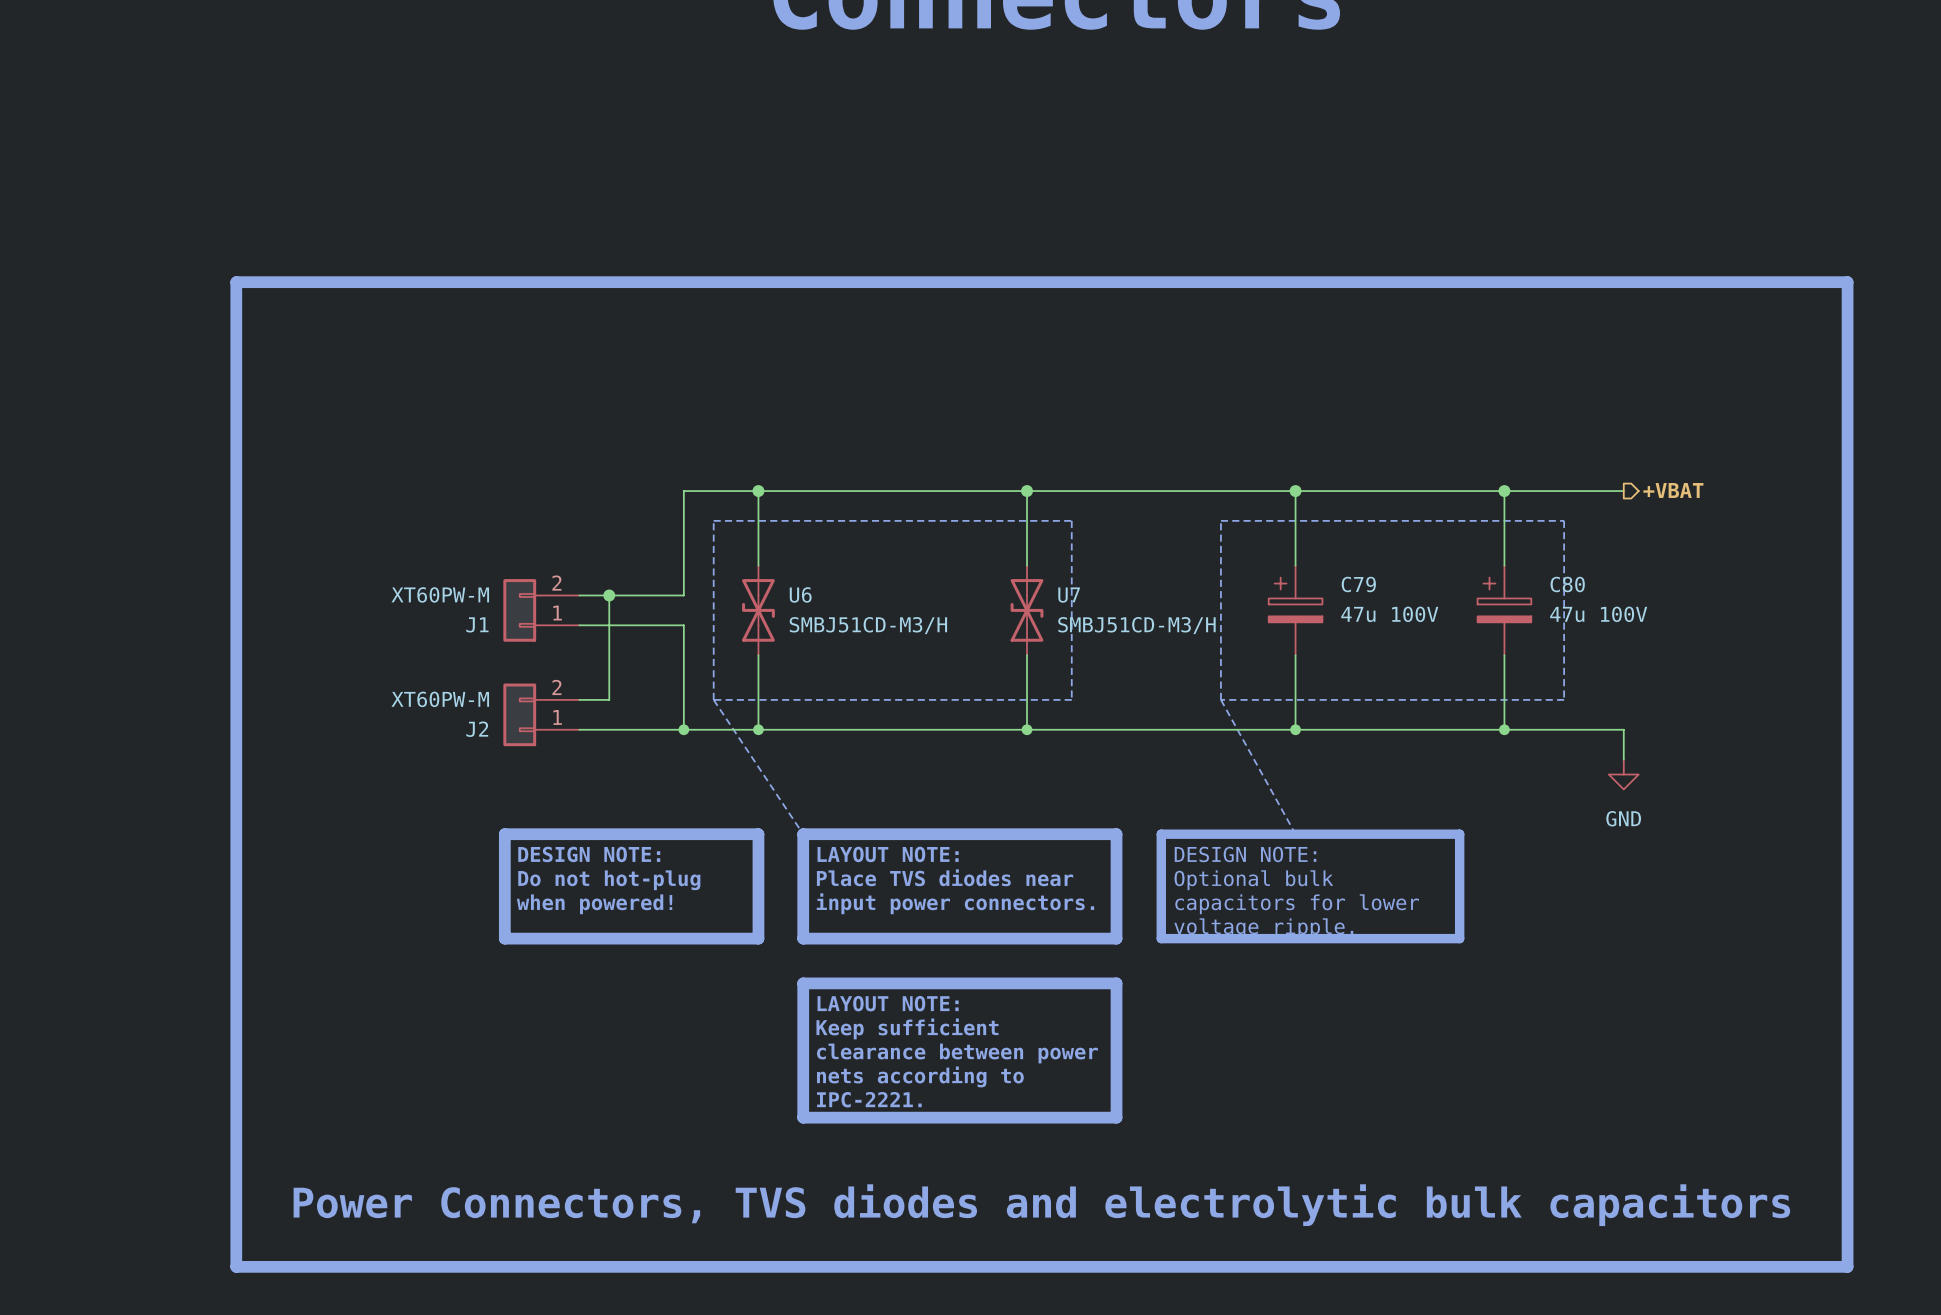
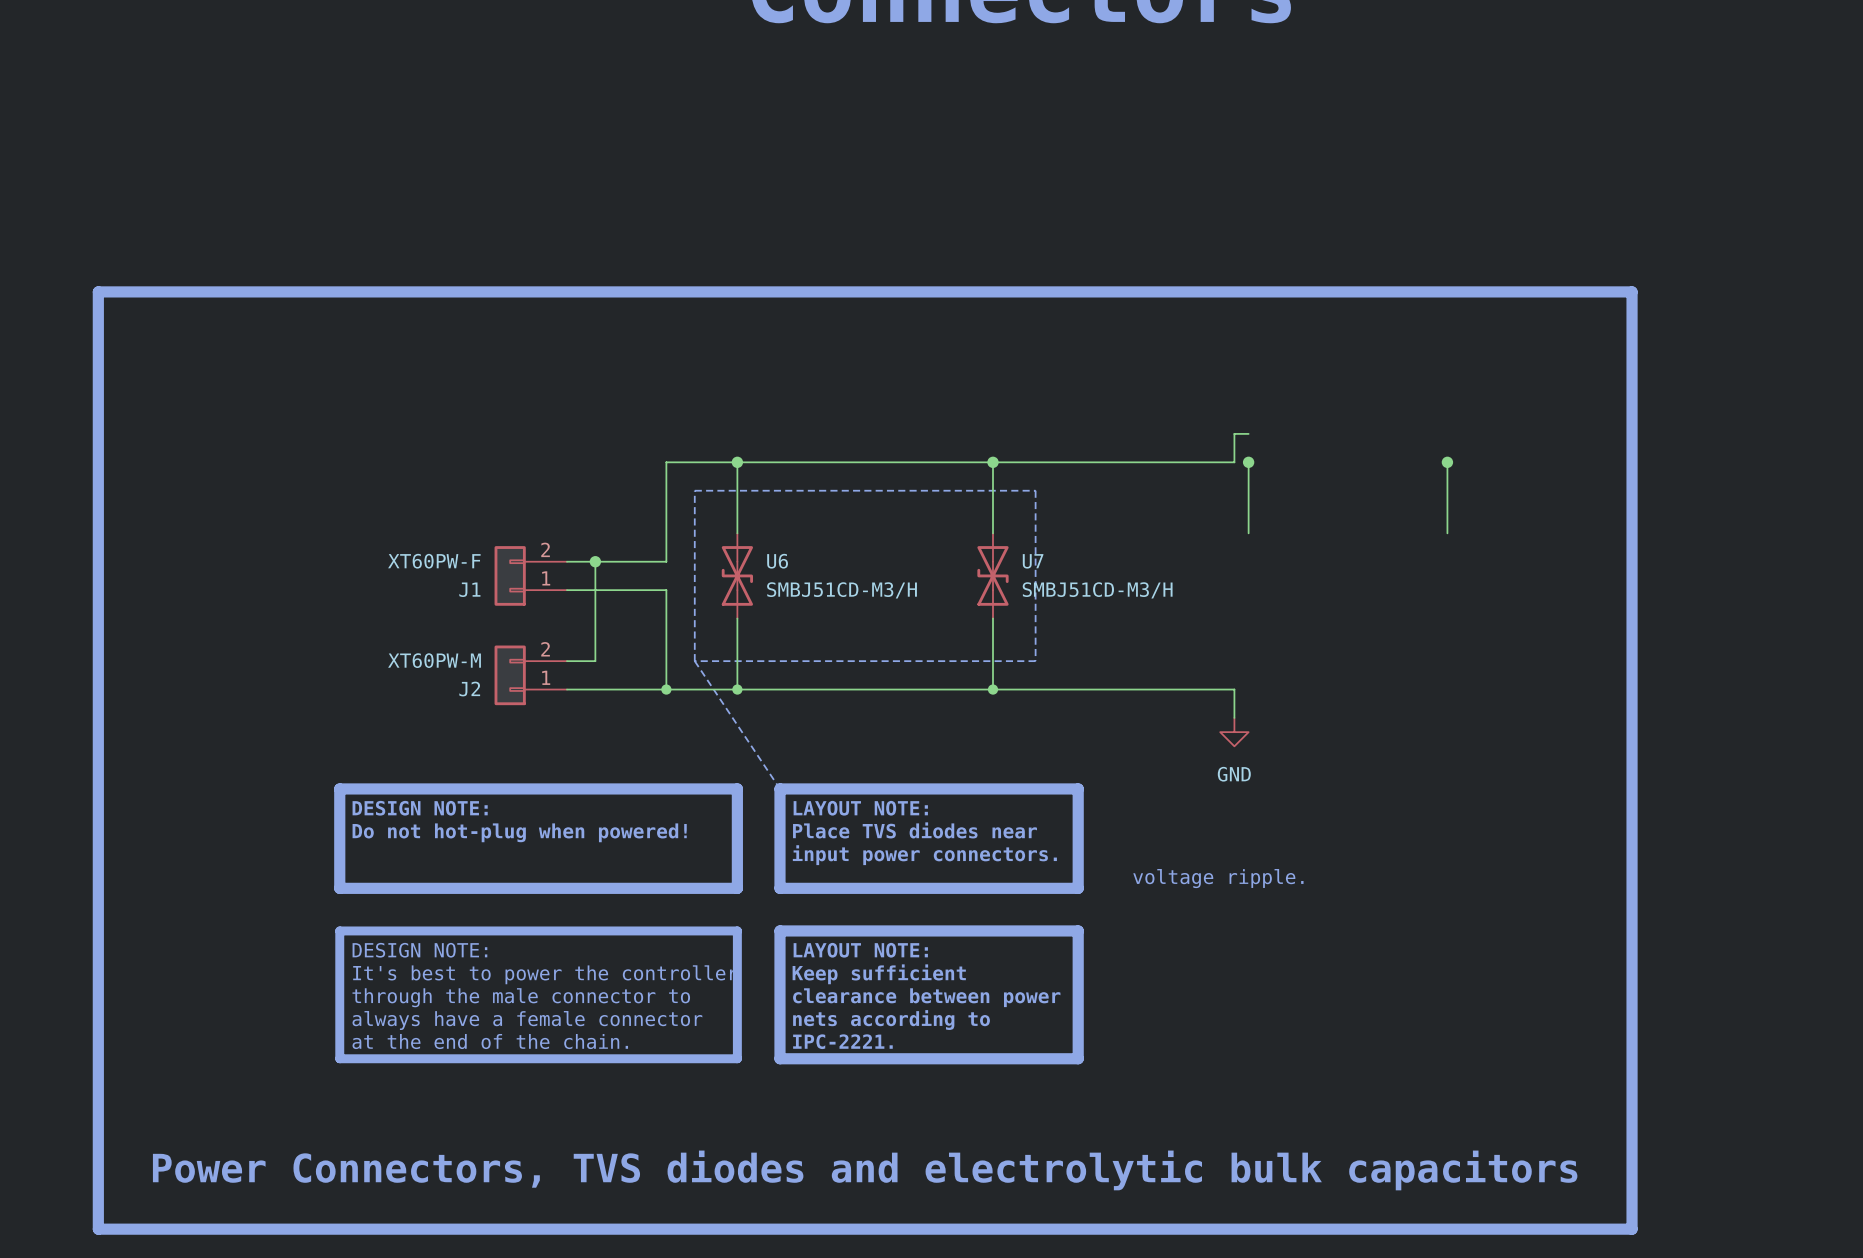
line: (236, 282) (1847, 282) (1847, 1266) (236, 1266) (236, 282) -> (98, 291) (1632, 291) (1632, 1229) (98, 1229) (98, 291)
hierarchical label: +VBAT (1673, 490) -> none
wire: (1280, 491) (1623, 491) -> (1234, 462) (1234, 433) (1248, 433)
J1 value: XT60PW-M (440, 594) -> XT60PW-F (434, 561)
C79: 47u 100V (1295, 610) -> none
C80: 47u 100V (1504, 610) -> none
wire: (1295, 655) (1295, 729) -> none
wire: (1504, 655) (1504, 729) -> none
line: (1220, 699) (1295, 834) -> none
line: (1220, 699) (1564, 699) (1564, 520) (1220, 520) (1220, 699) -> none
wire: (1280, 729) (1623, 729) (1623, 759) -> (1234, 689) (1234, 717)
junction: (1295, 729) -> none
junction: (1504, 729) -> none
power symbol: none -> GND (1234, 732)
power symbol: GND (1623, 774) -> none
line: (504, 834) (504, 938) -> (495, 788) (339, 788) (339, 888) (495, 888)
line: (1161, 834) (1459, 834) (1459, 938) (1161, 938) (1161, 834) -> none
text position: DESIGN NOTE: (589, 854) -> DESIGN NOTE: (420, 808)
text: DESIGN NOTE: (1245, 854) -> none
text: none -> Do not hot-plug when powered! (519, 832)
text: Do not hot-plug (609, 880) -> none
text: Optional bulk (1253, 880) -> none
text: when powered! (594, 904) -> none
text: capacitors for lower (1297, 904) -> none
line: none -> (339, 930) (737, 930) (737, 1058) (339, 1058) (339, 930)
text: none -> DESIGN NOTE: (419, 950)
text: none -> It's best to power the controller (545, 974)
text: none -> through the male connector to (521, 997)
text: none -> always have a female connector (527, 1020)
text: none -> at the end of the chain. (490, 1041)
text position: Power Connectors, TVS diodes and electrolytic bulk capacitors (1041, 1205) -> Power Connectors, TVS diodes and electrolytic bulk capacitors (865, 1170)

